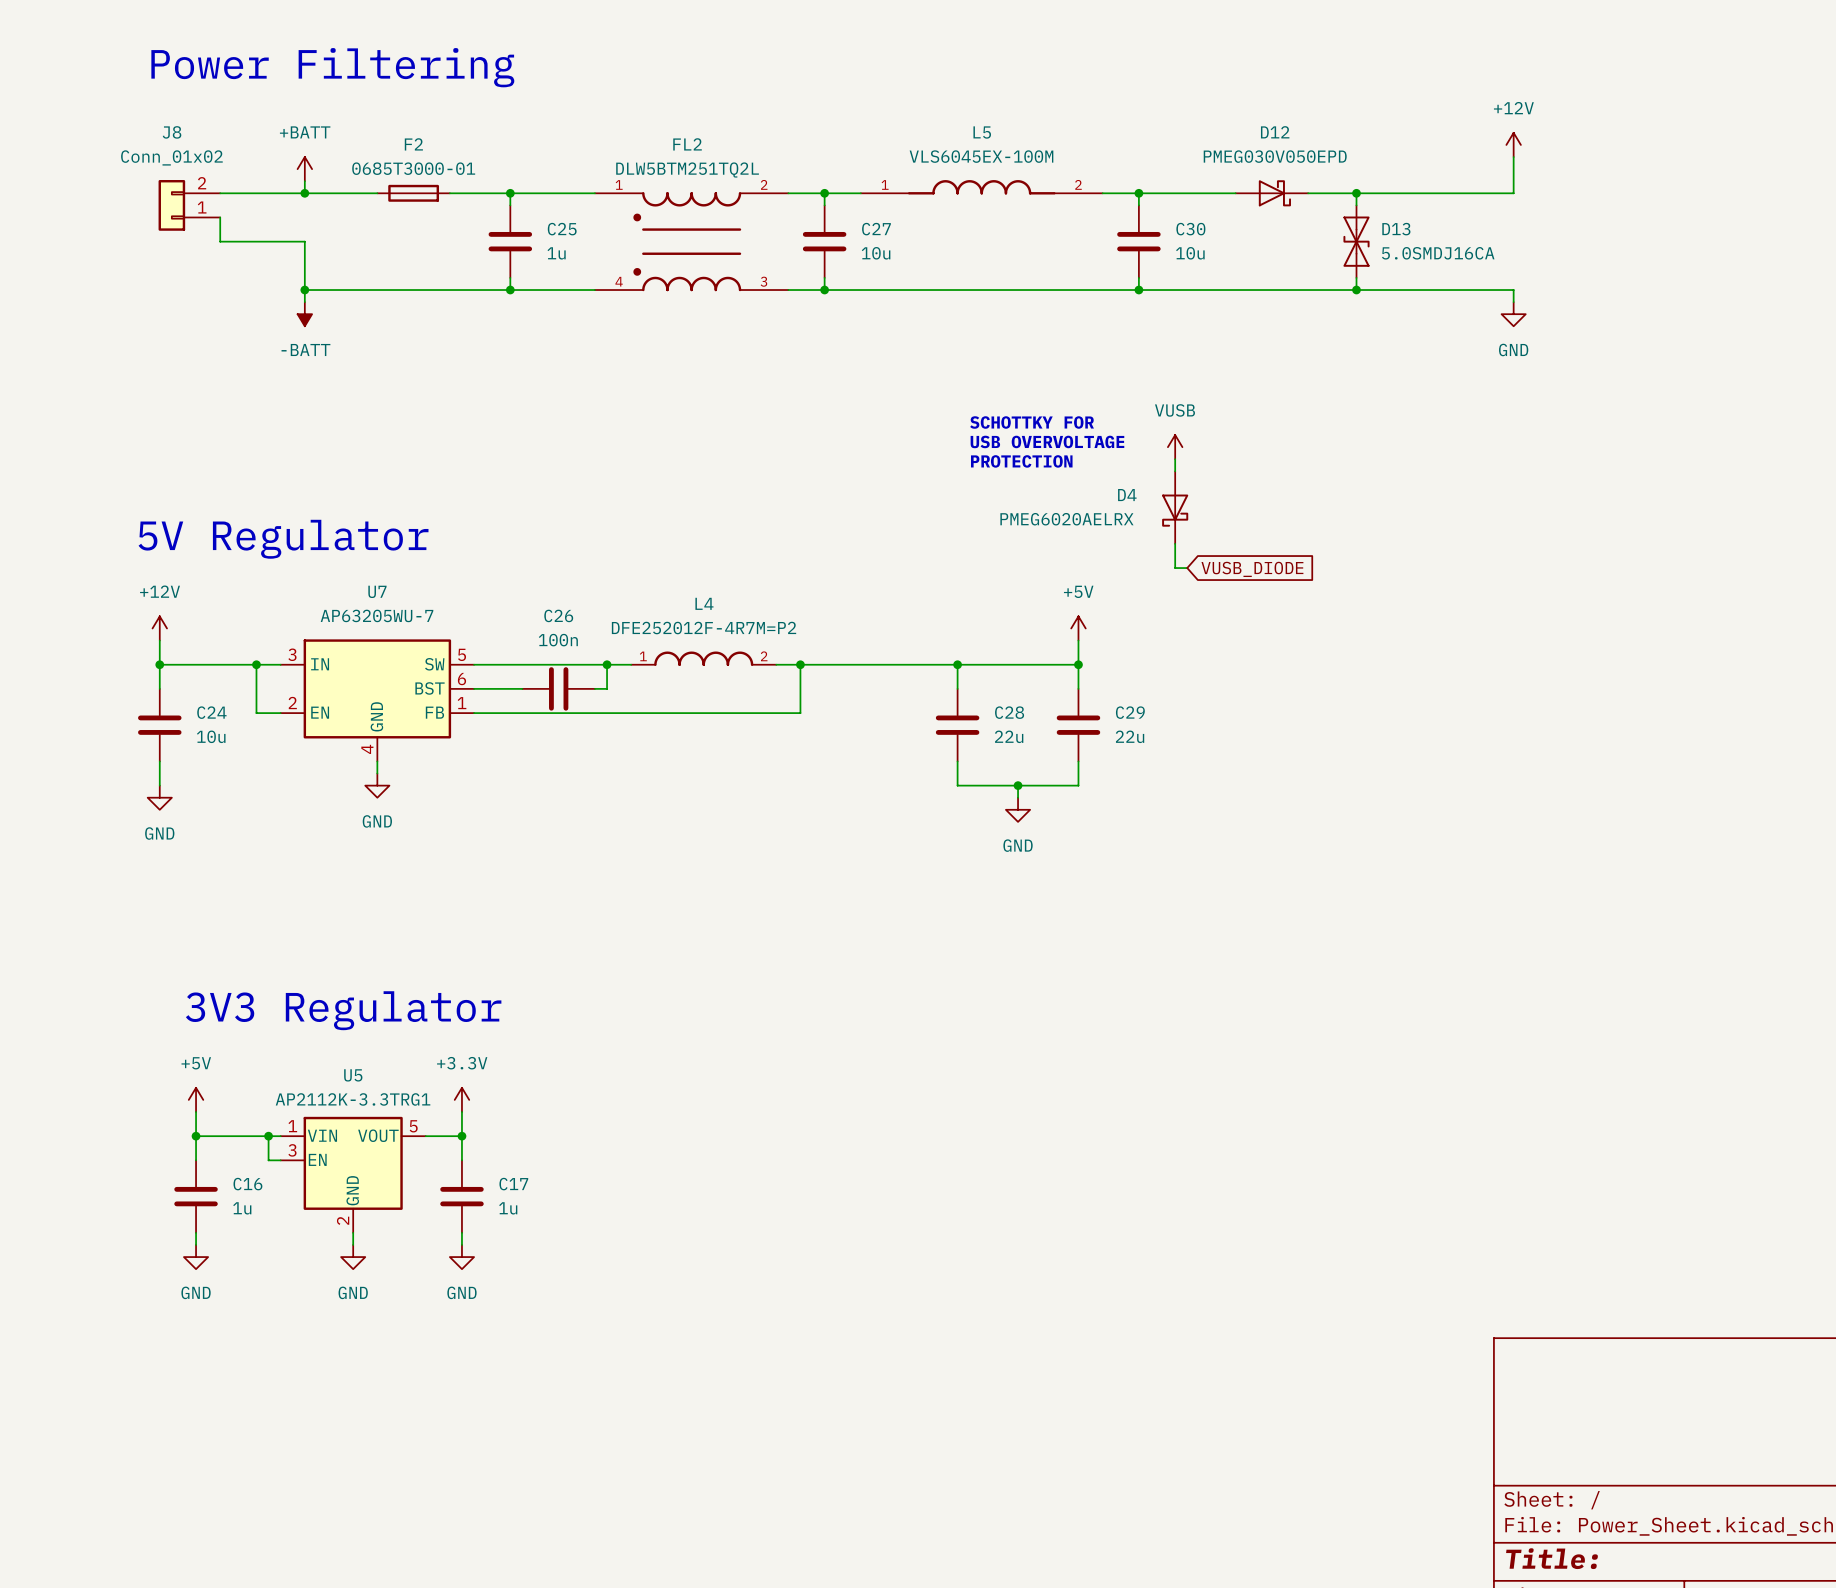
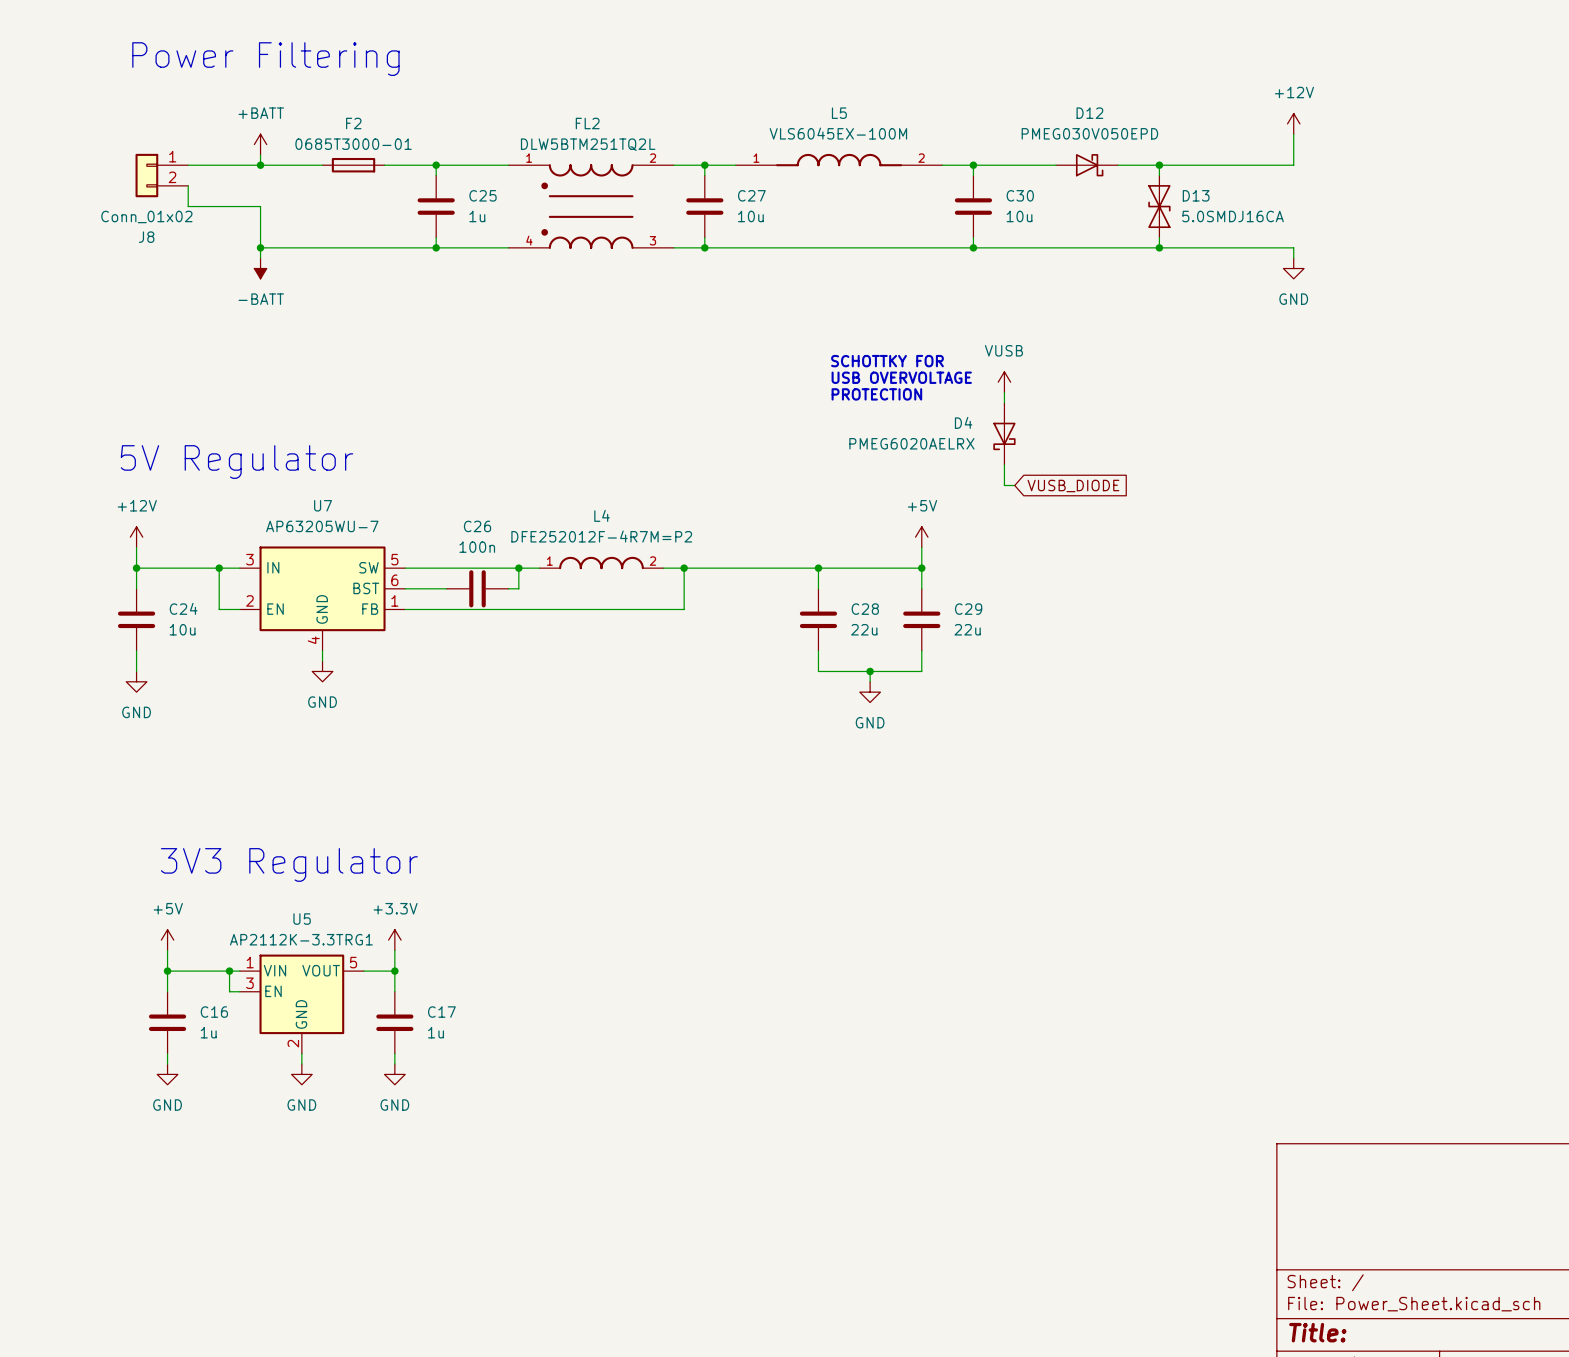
J8 flip: as is (171, 205) -> up-down (146, 175)

